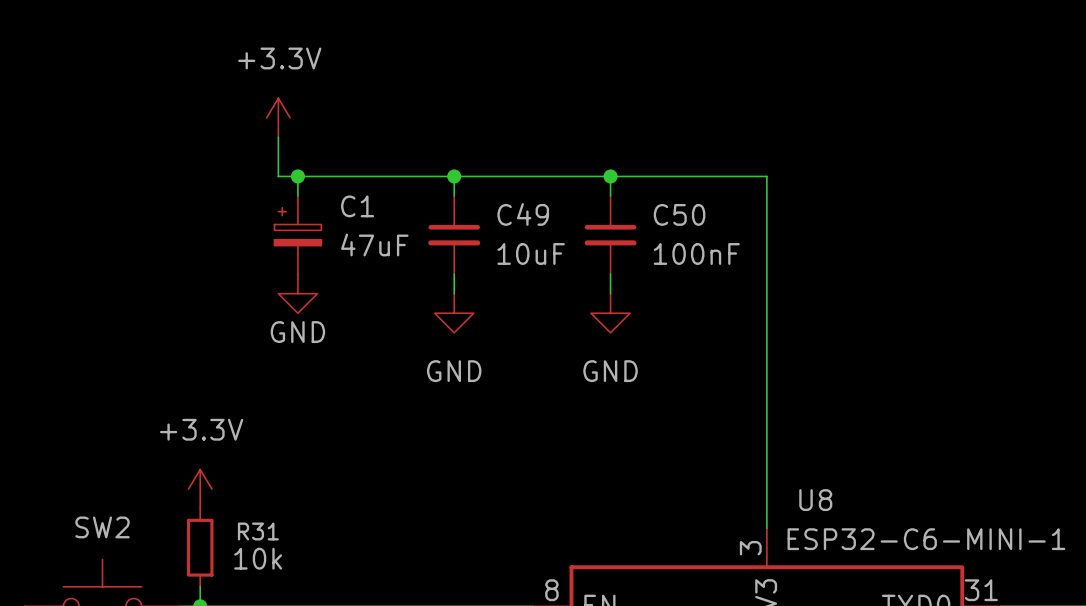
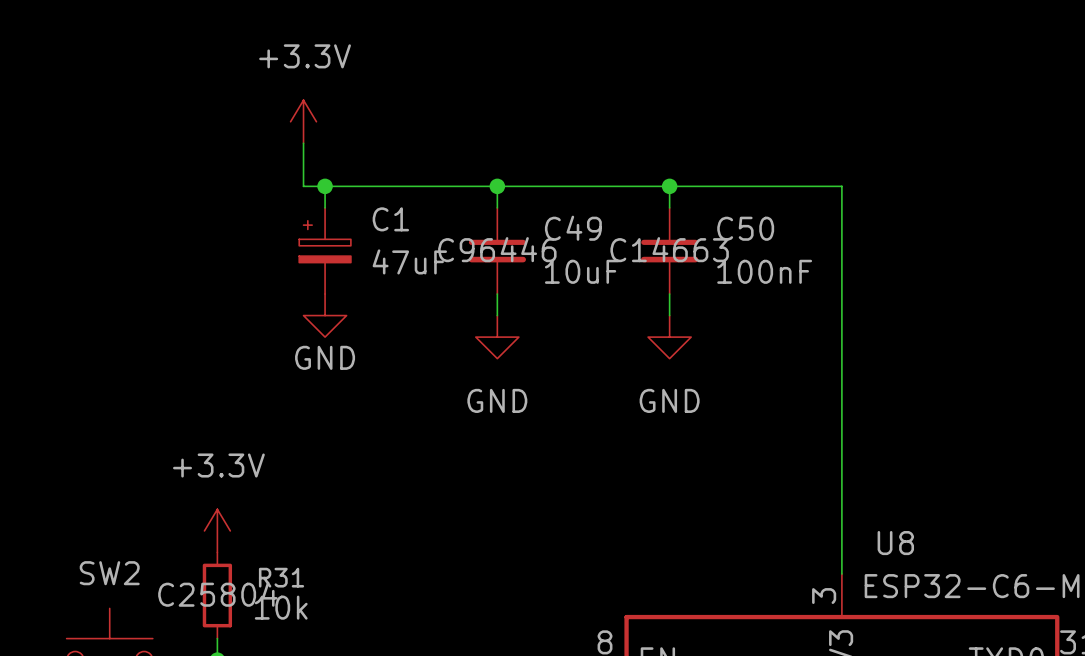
C49 text: none -> C96446 (497, 249)
C50 text: none -> C14663 (669, 249)
R31 text: none -> C25804 (217, 594)

